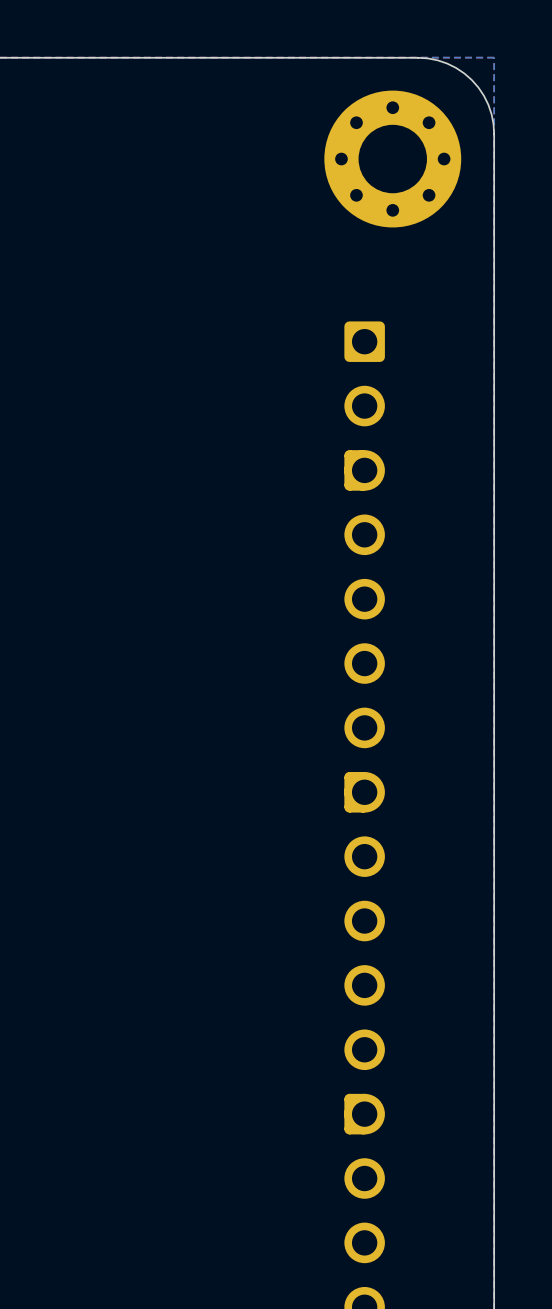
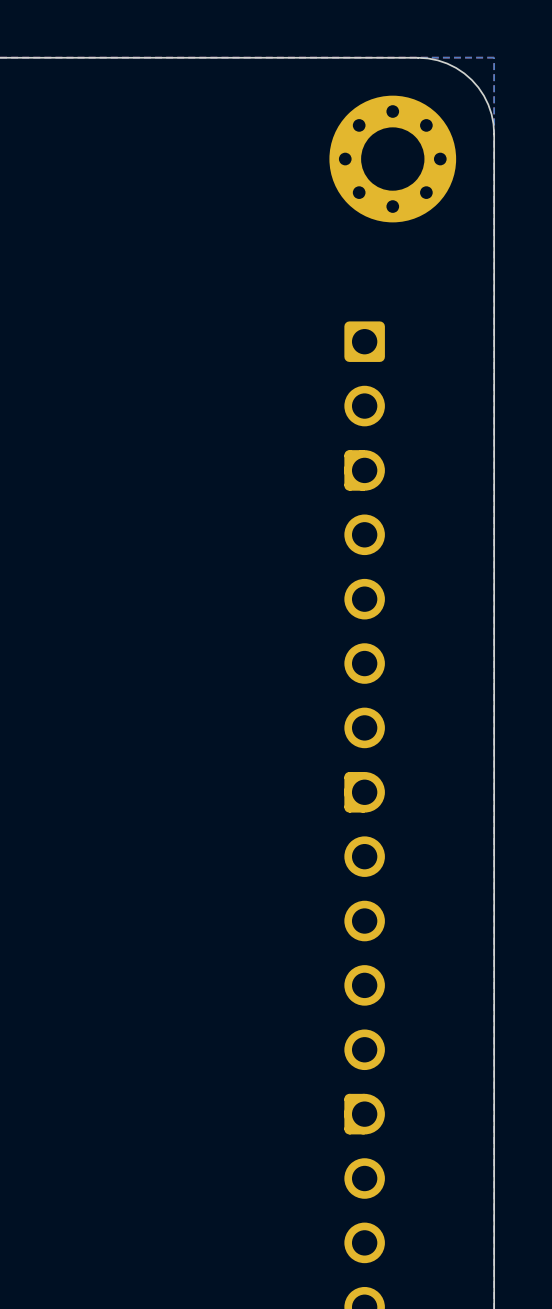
part footprint: [324, 90, 462, 228] -> [329, 95, 457, 223]

